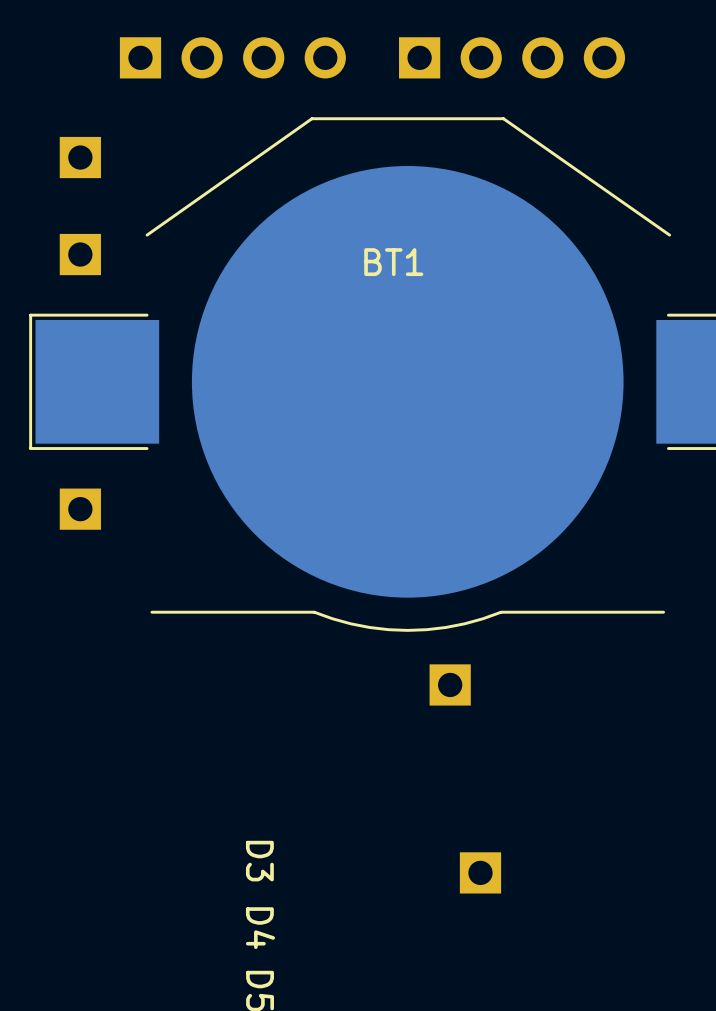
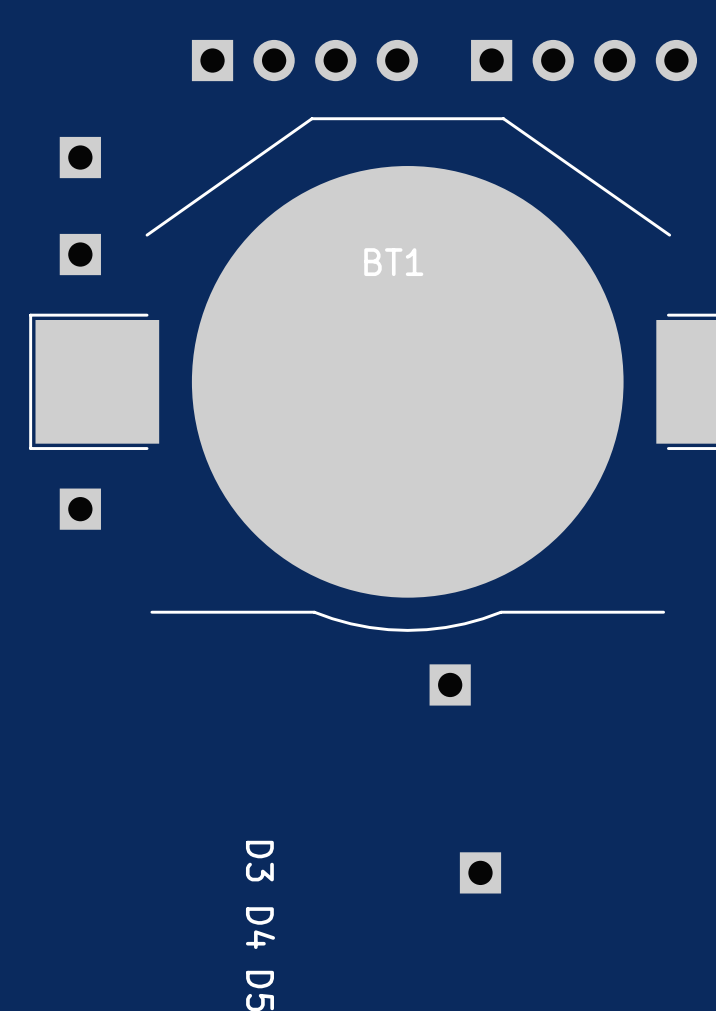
part position: (232, 57) -> (304, 60)
part position: (512, 57) -> (584, 60)

